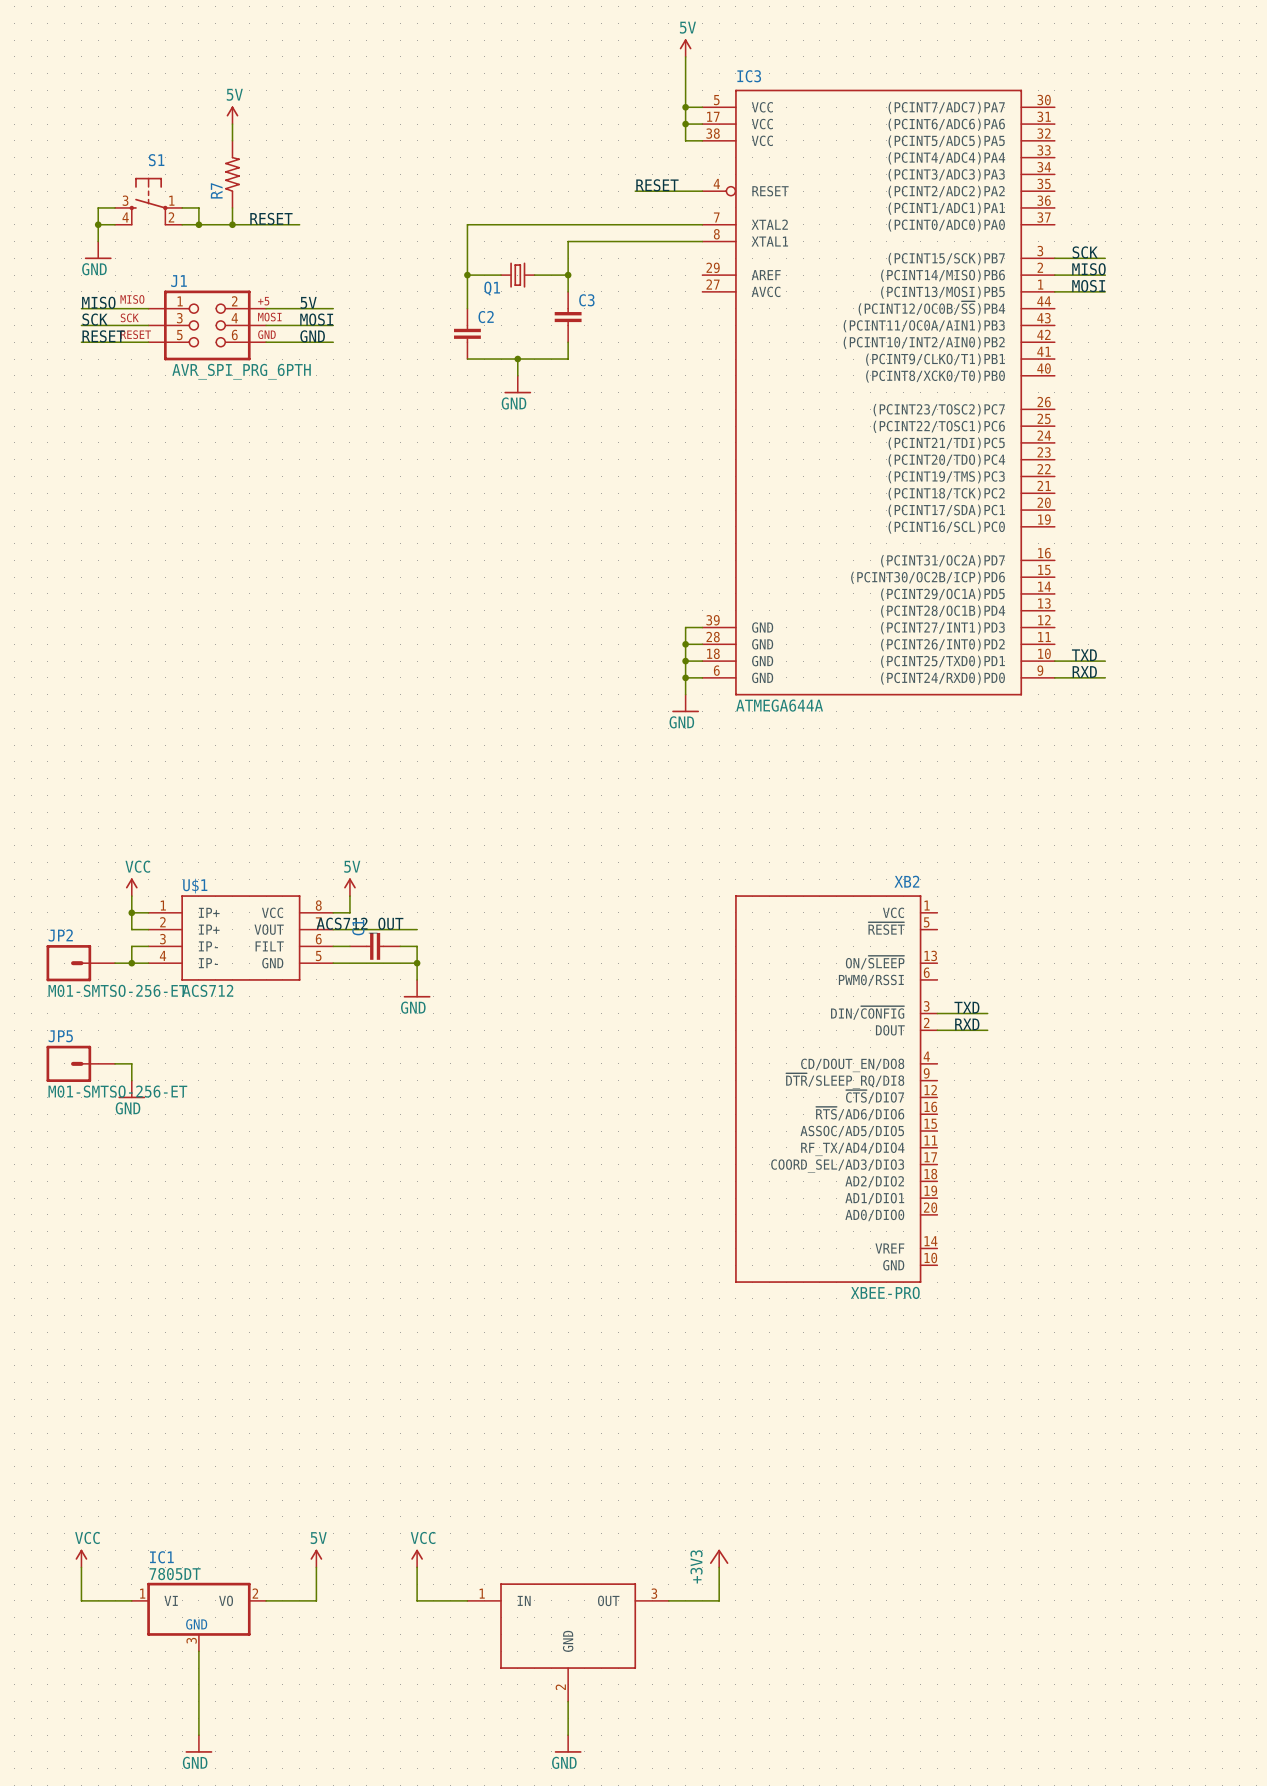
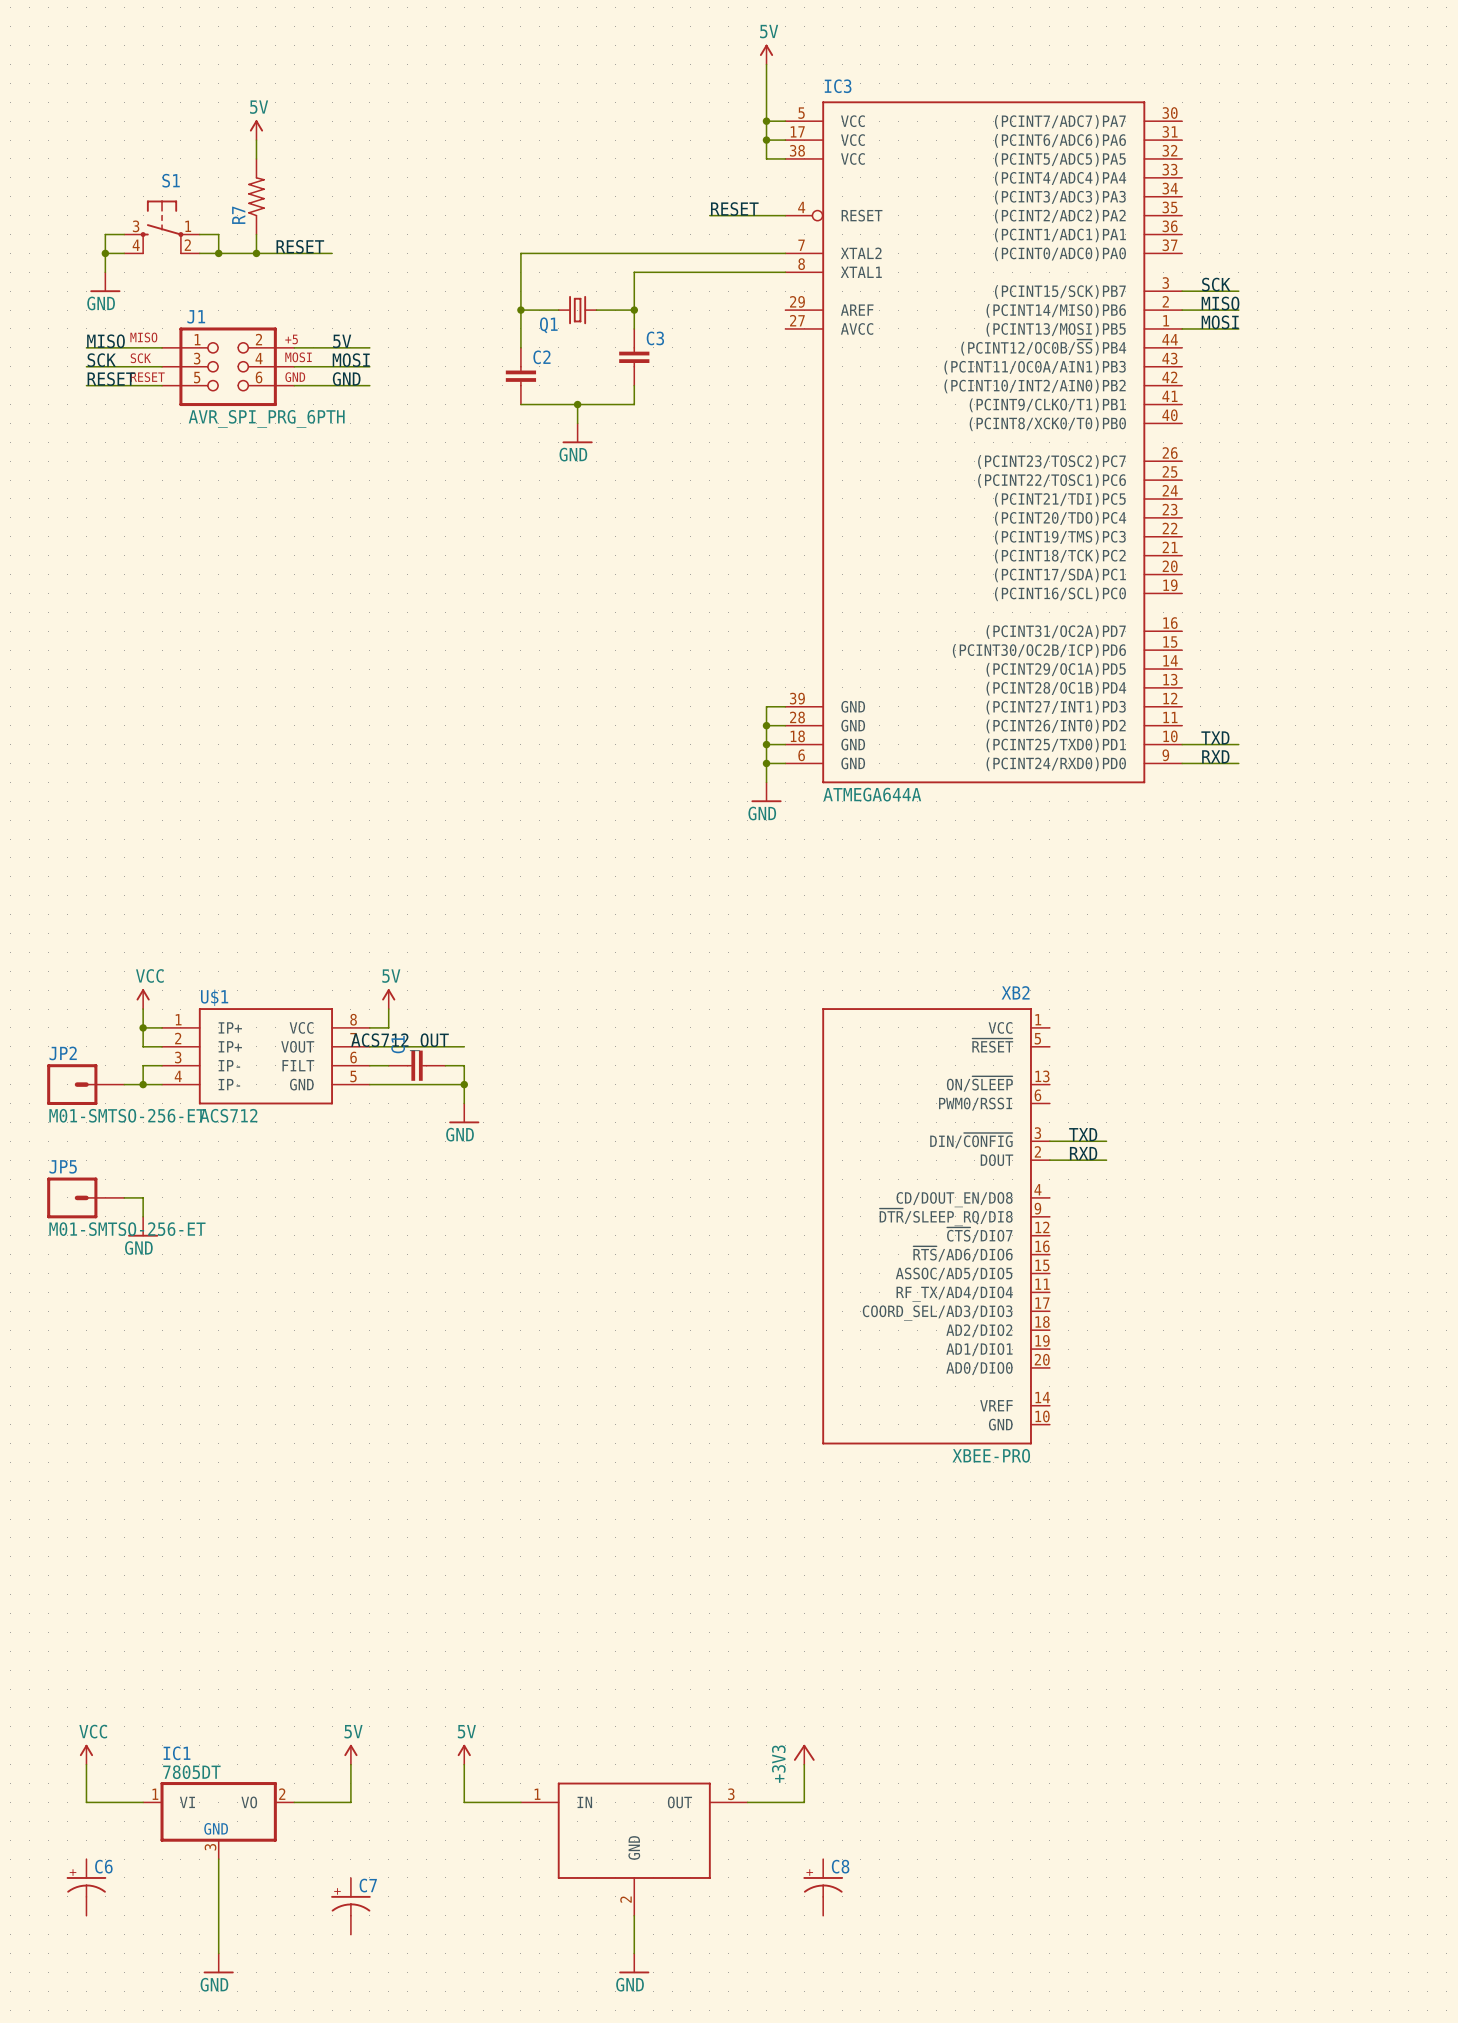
power symbol: VCC (417, 1558) -> 5V (464, 1754)
C6: none -> (86, 1887)
C8: none -> (823, 1887)
C7: none -> (350, 1906)

